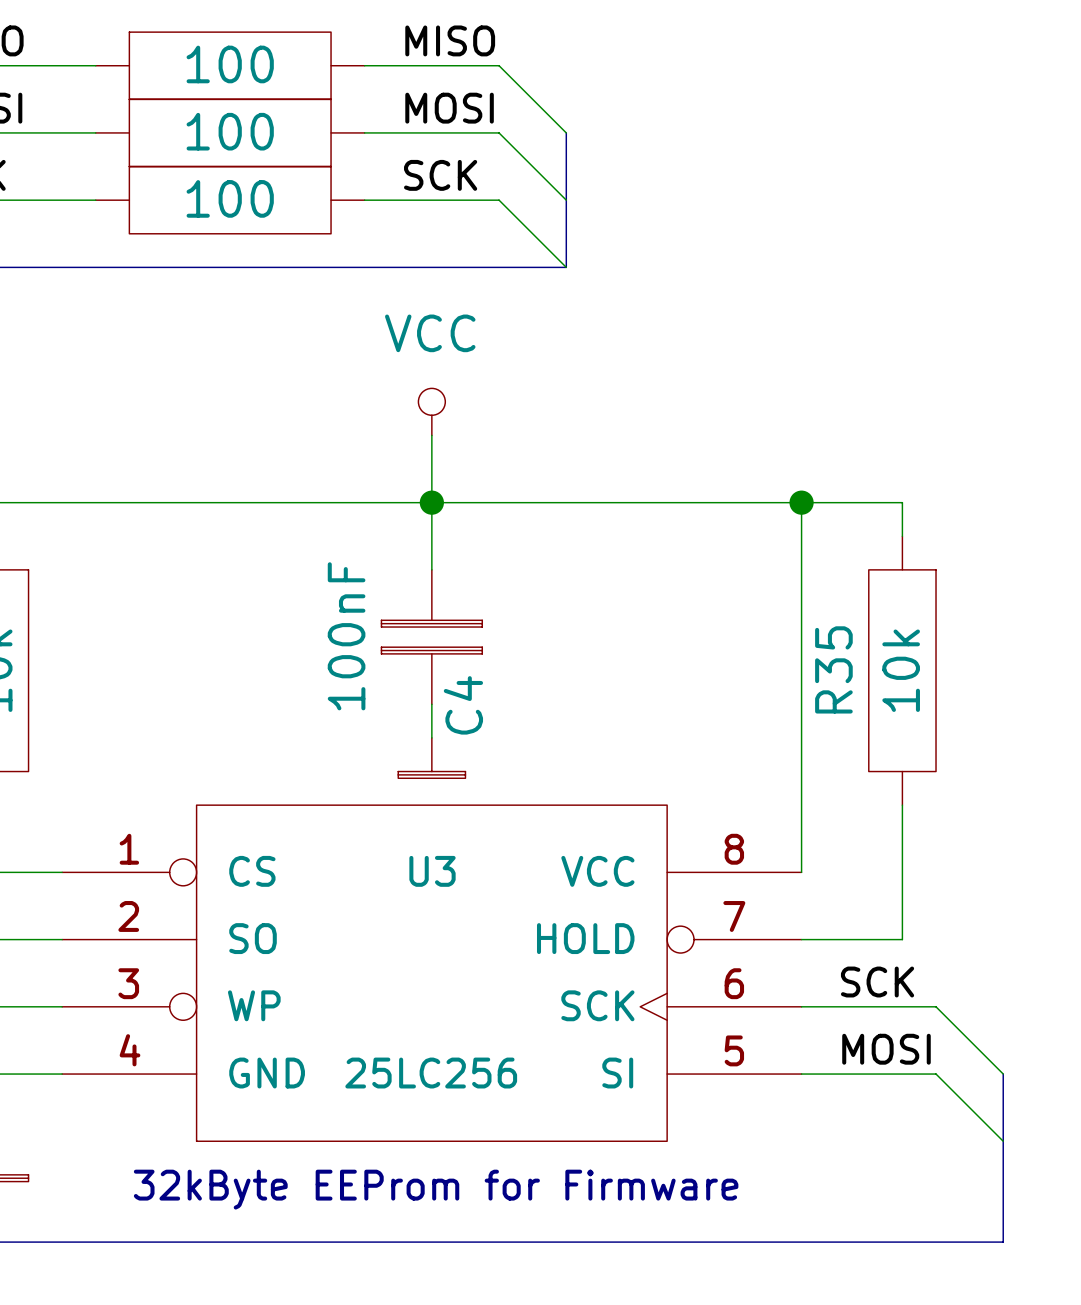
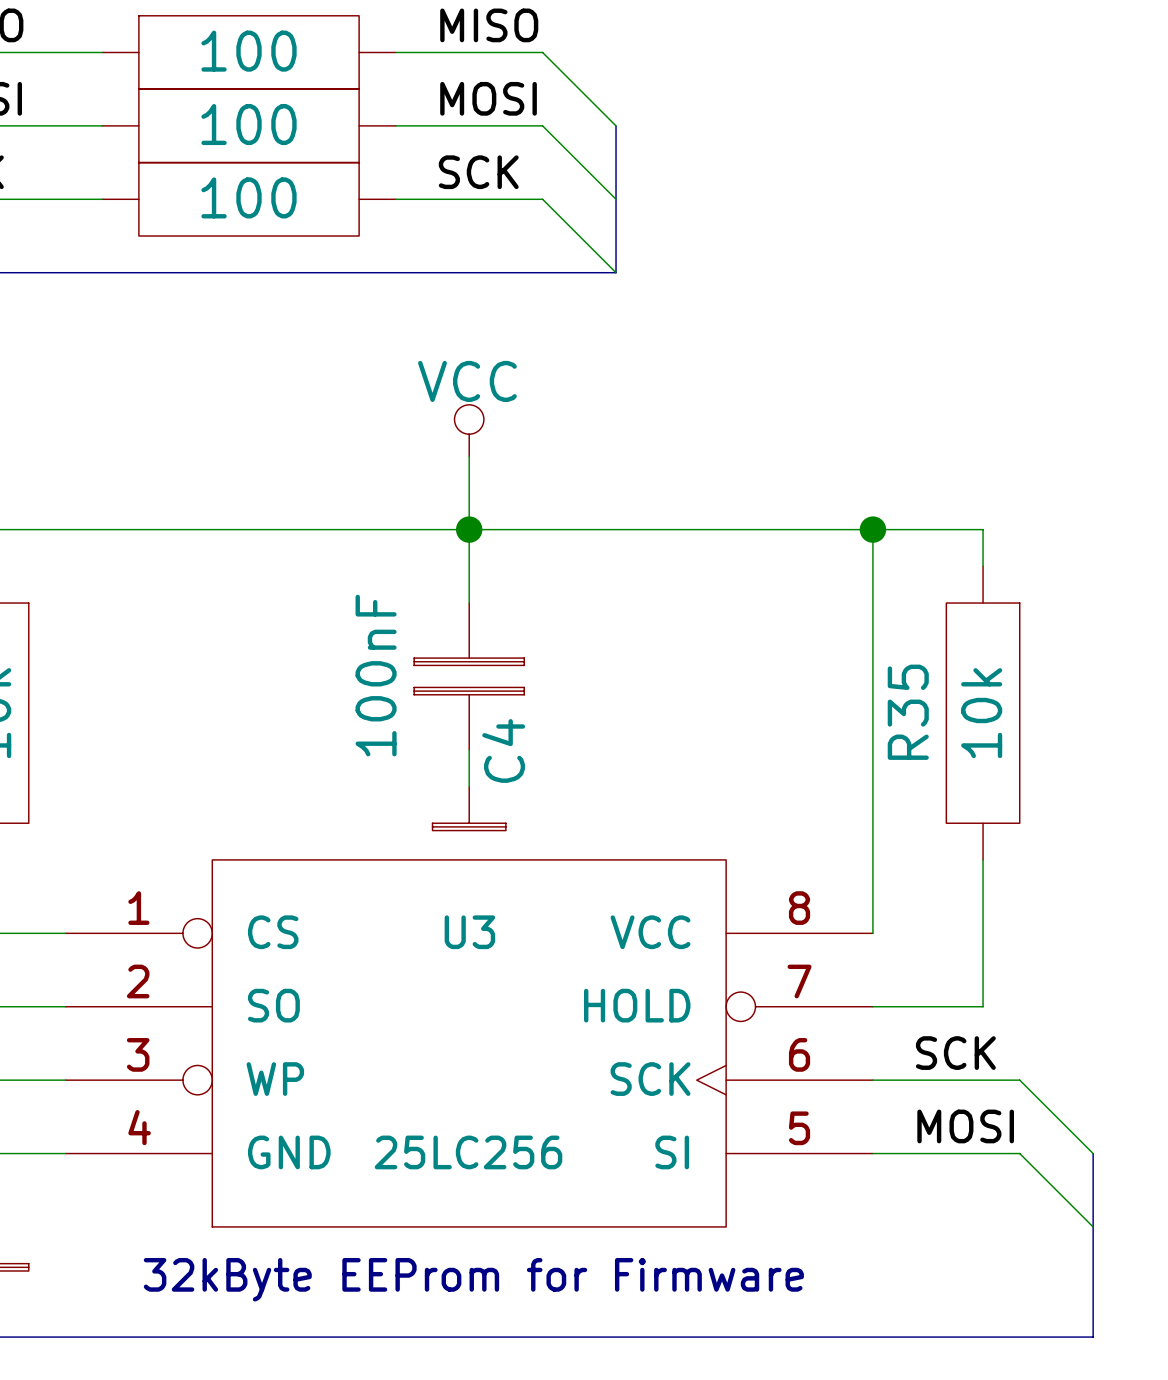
power symbol text position: VCC (430, 333) -> VCC (467, 381)

